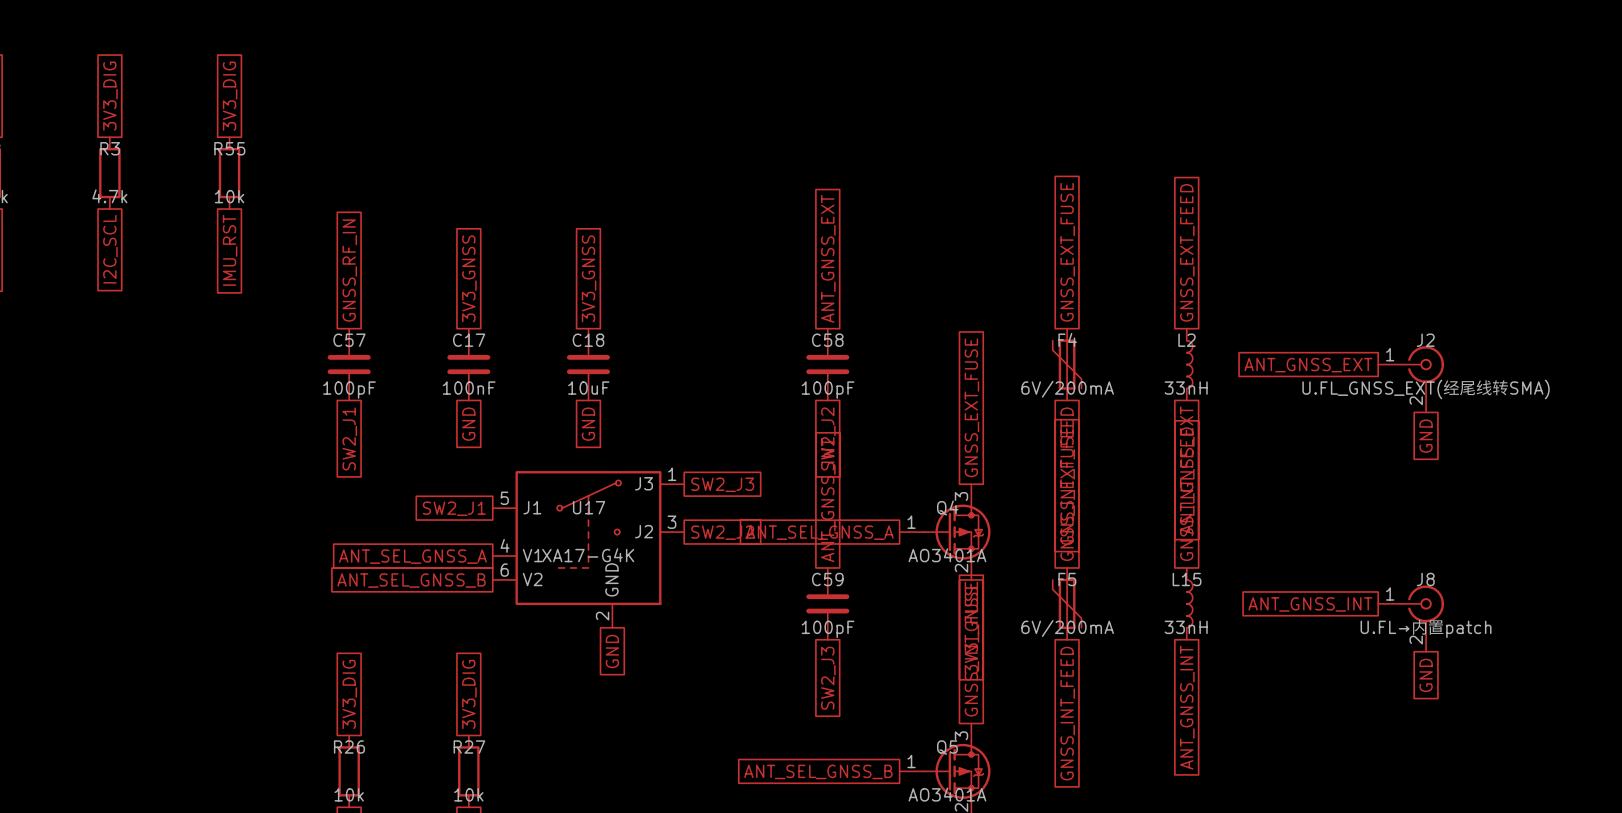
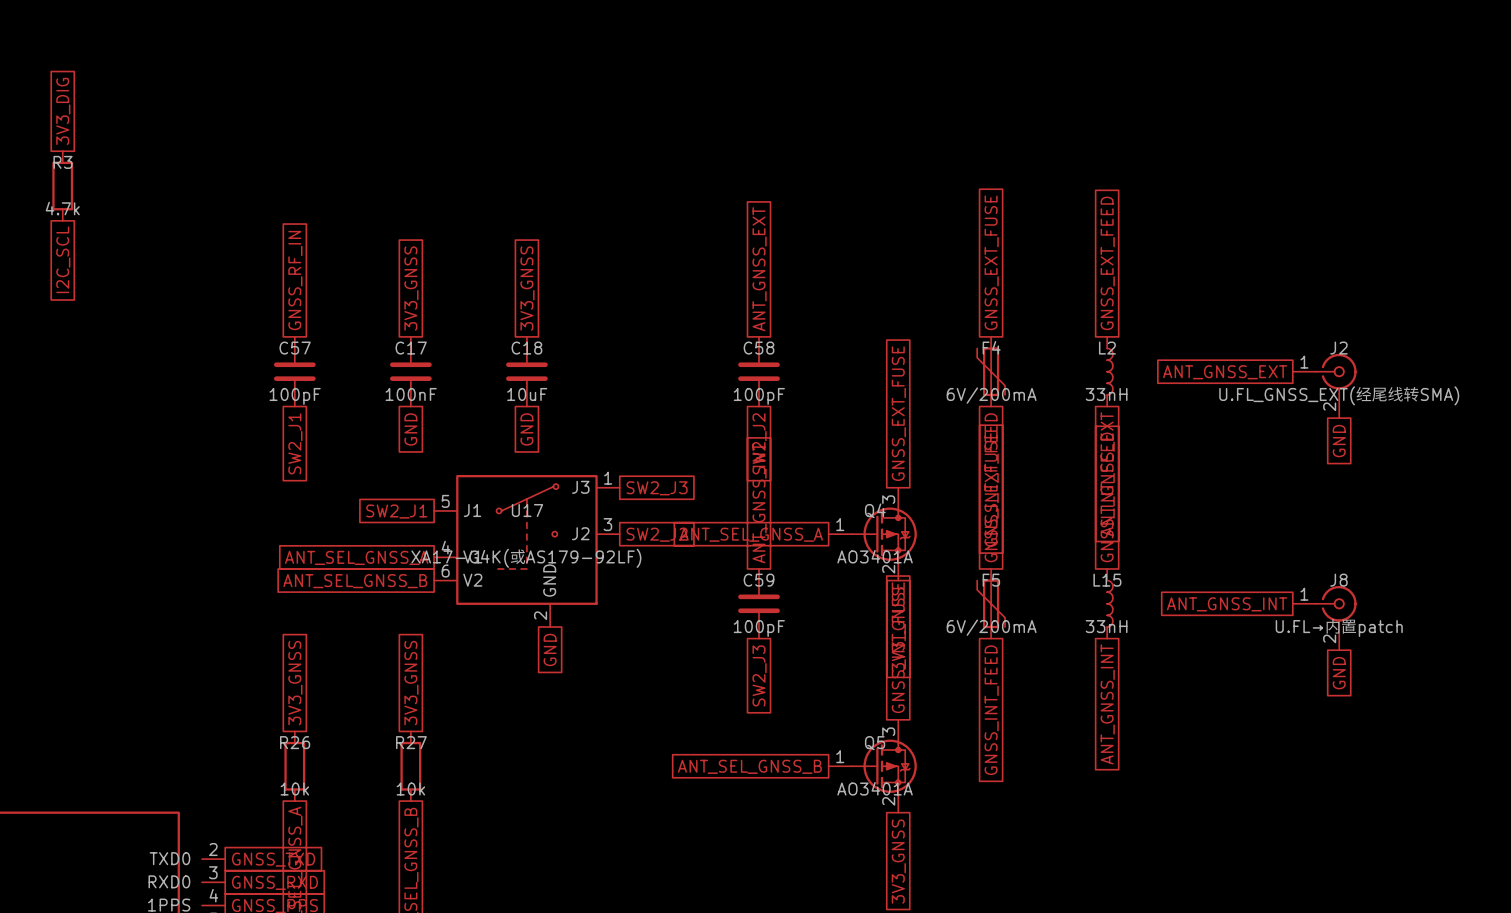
global label: 3V3_DIG (230, 96) -> none
R55: 10k (229, 173) -> none
global label: IMU_RST (230, 250) -> none
U17 value: XA17-G4K (588, 555) -> XA17-G4K(或AS179-92LF) (526, 558)
global label: 3V3_DIG (349, 694) -> 3V3_GNSS (295, 683)
global label: 3V3_DIG (469, 694) -> 3V3_GNSS (411, 683)

